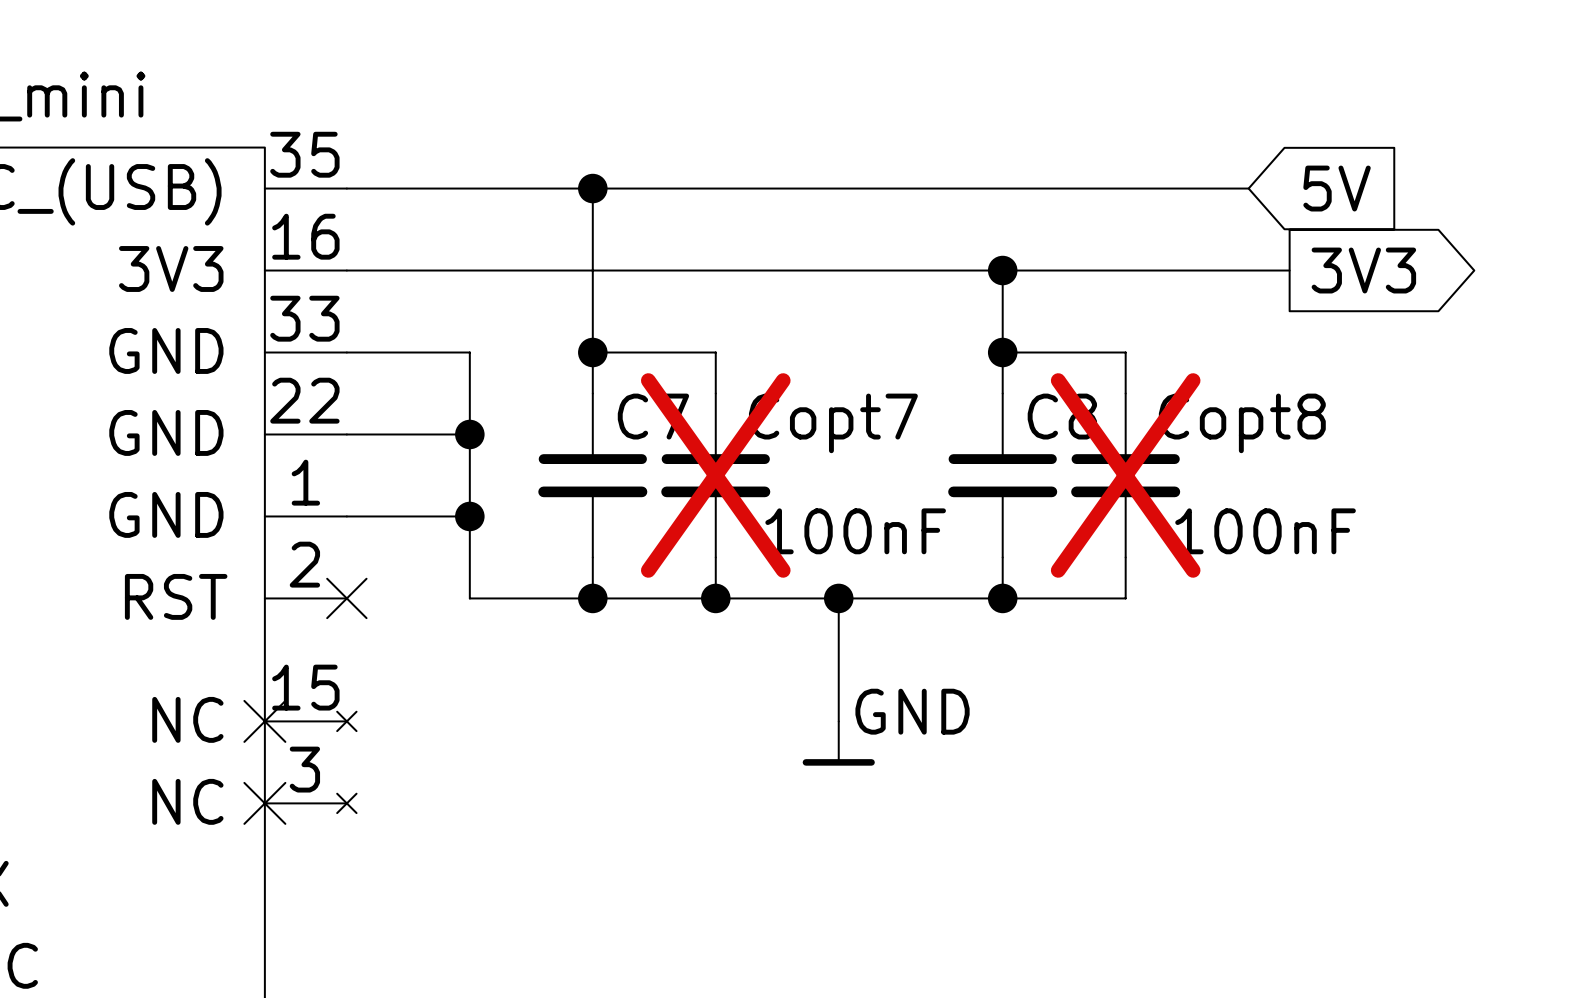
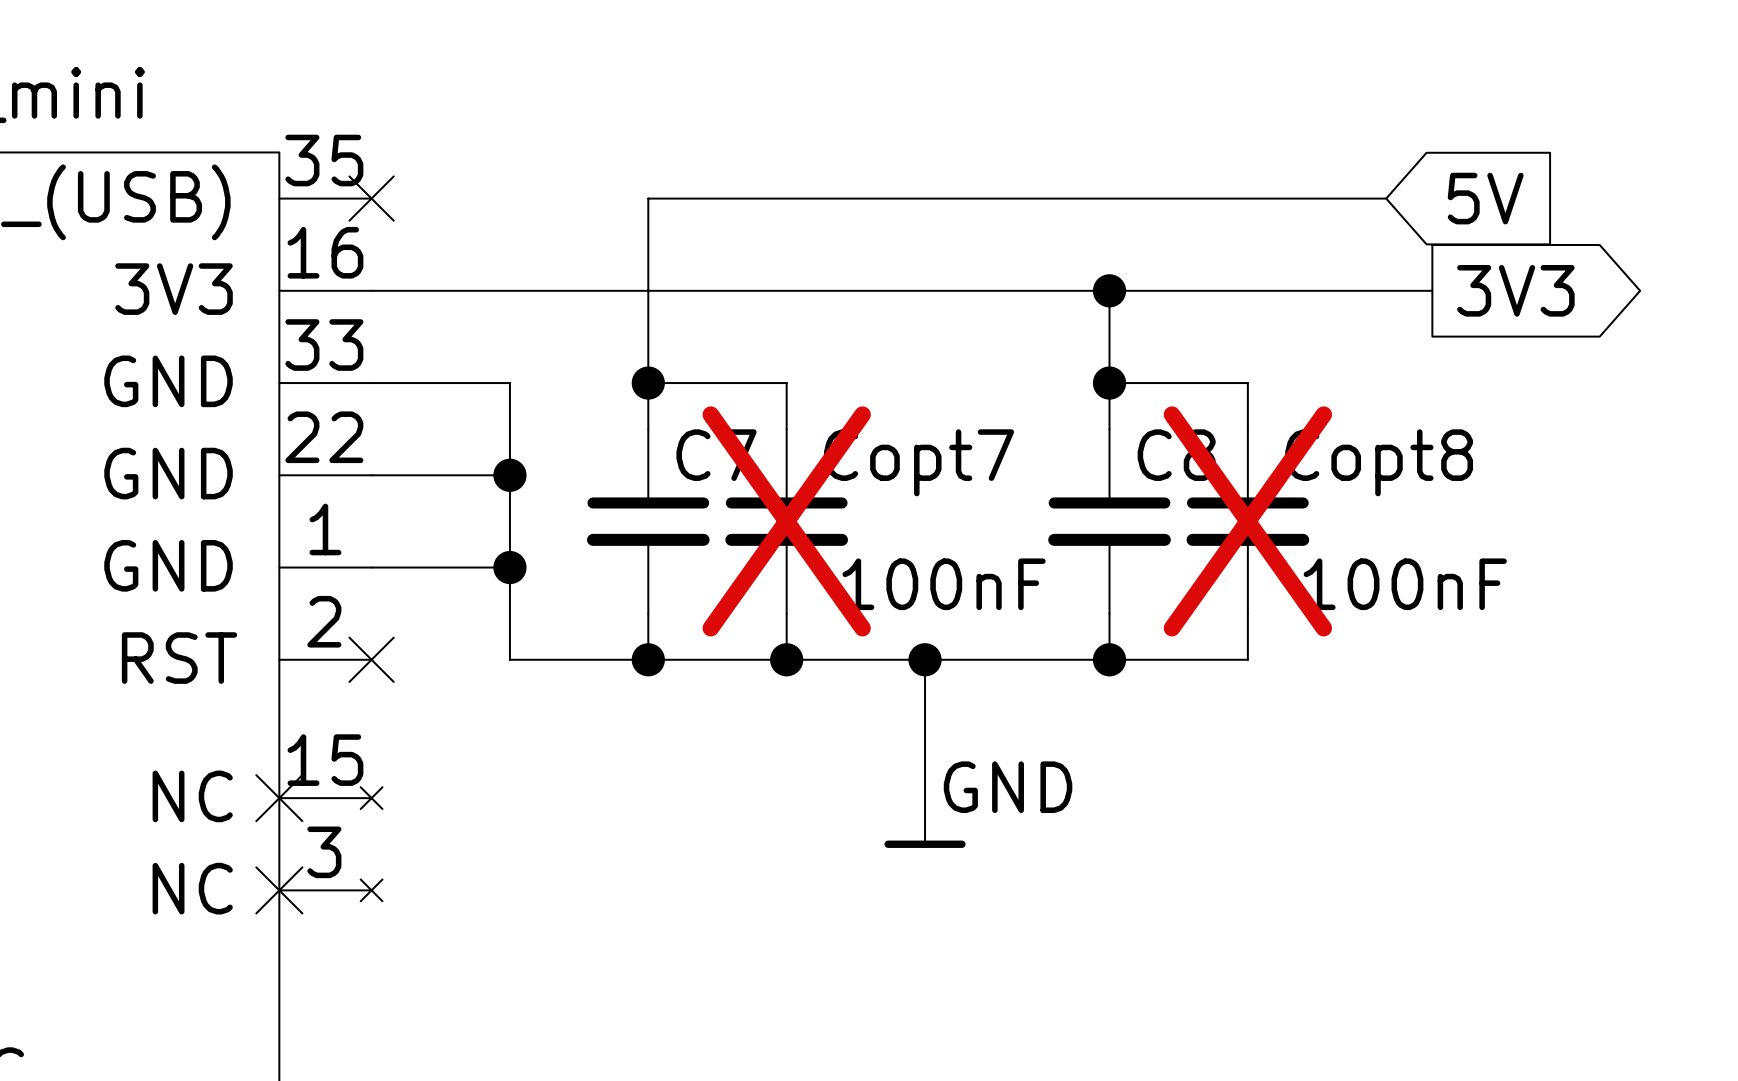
wire: (346, 188) (592, 188) -> none
no-connect mark: none -> (371, 198)
junction: (592, 188) -> none

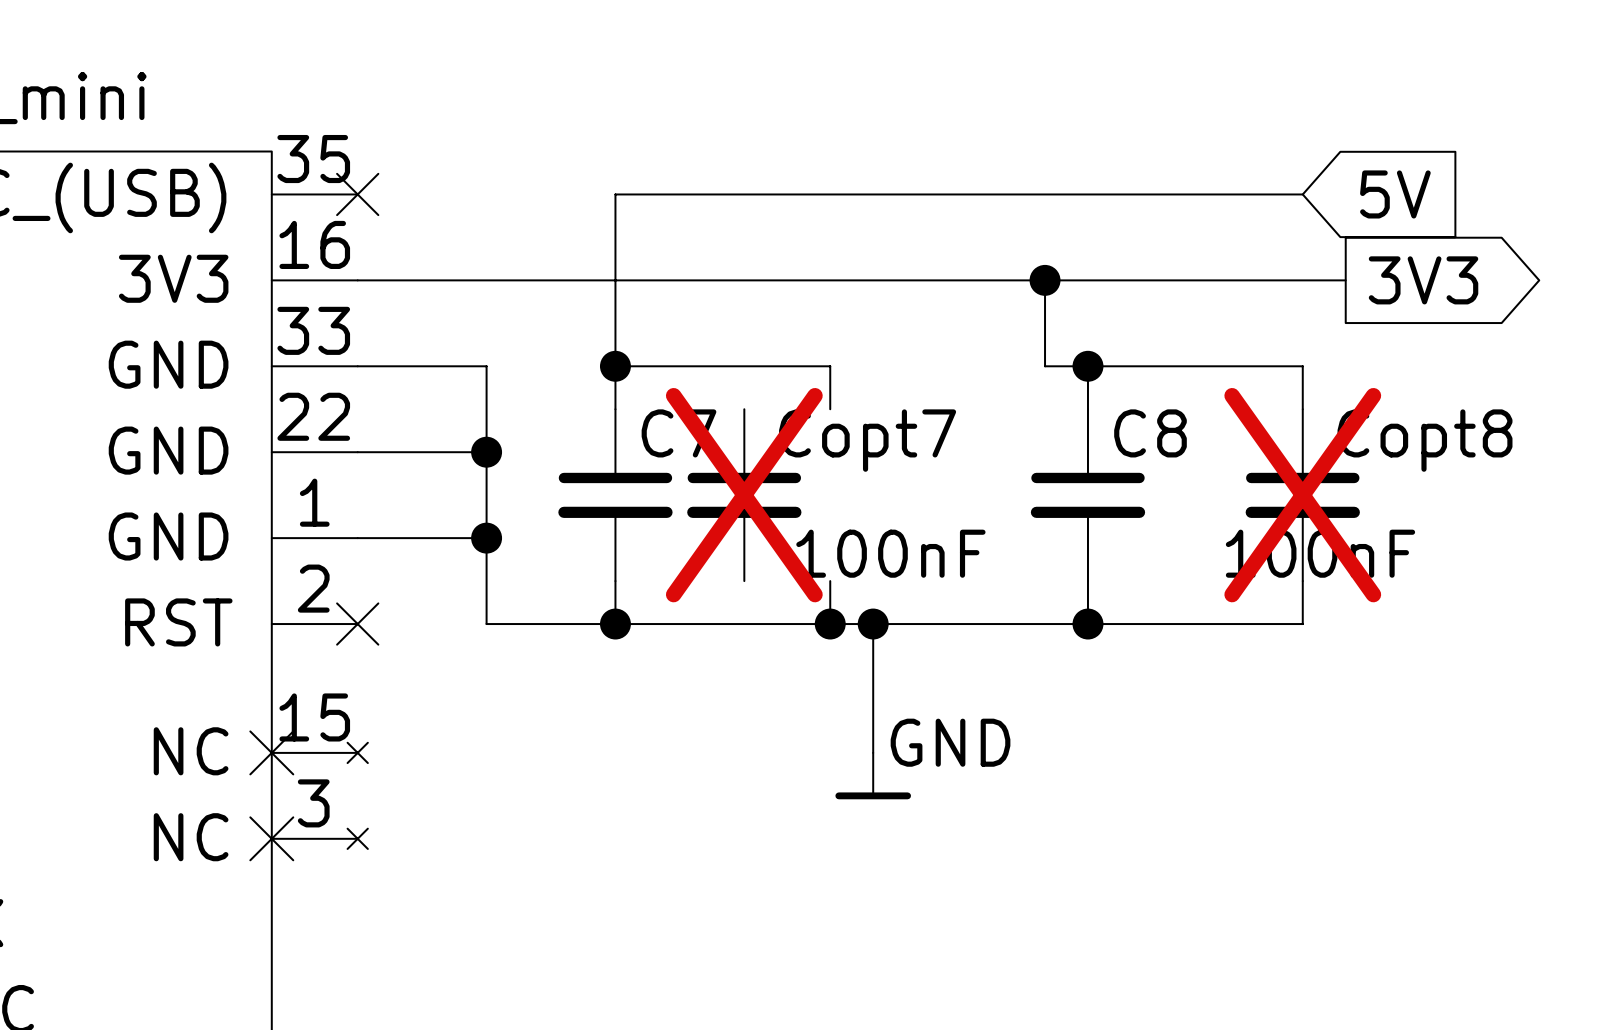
wire: (786, 383) (786, 429) -> (744, 366) (830, 366) (830, 409)
wire: (1109, 383) (1109, 429) -> (1087, 366) (1087, 409)
junction position: (1109, 383) -> (1087, 366)
wire: (1247, 383) (1247, 429) -> (1173, 366) (1302, 366) (1302, 409)
C8 position: (1109, 521) -> (1087, 495)
Copt8 position: (1247, 521) -> (1302, 495)
wire: (786, 613) (786, 659) -> (830, 581) (830, 624)
wire: (1109, 613) (1109, 659) -> (1087, 581) (1087, 624)
wire: (1247, 613) (1247, 659) -> (1302, 581) (1302, 624) (1173, 624)
junction position: (786, 659) -> (830, 624)
junction position: (1109, 659) -> (1087, 624)

